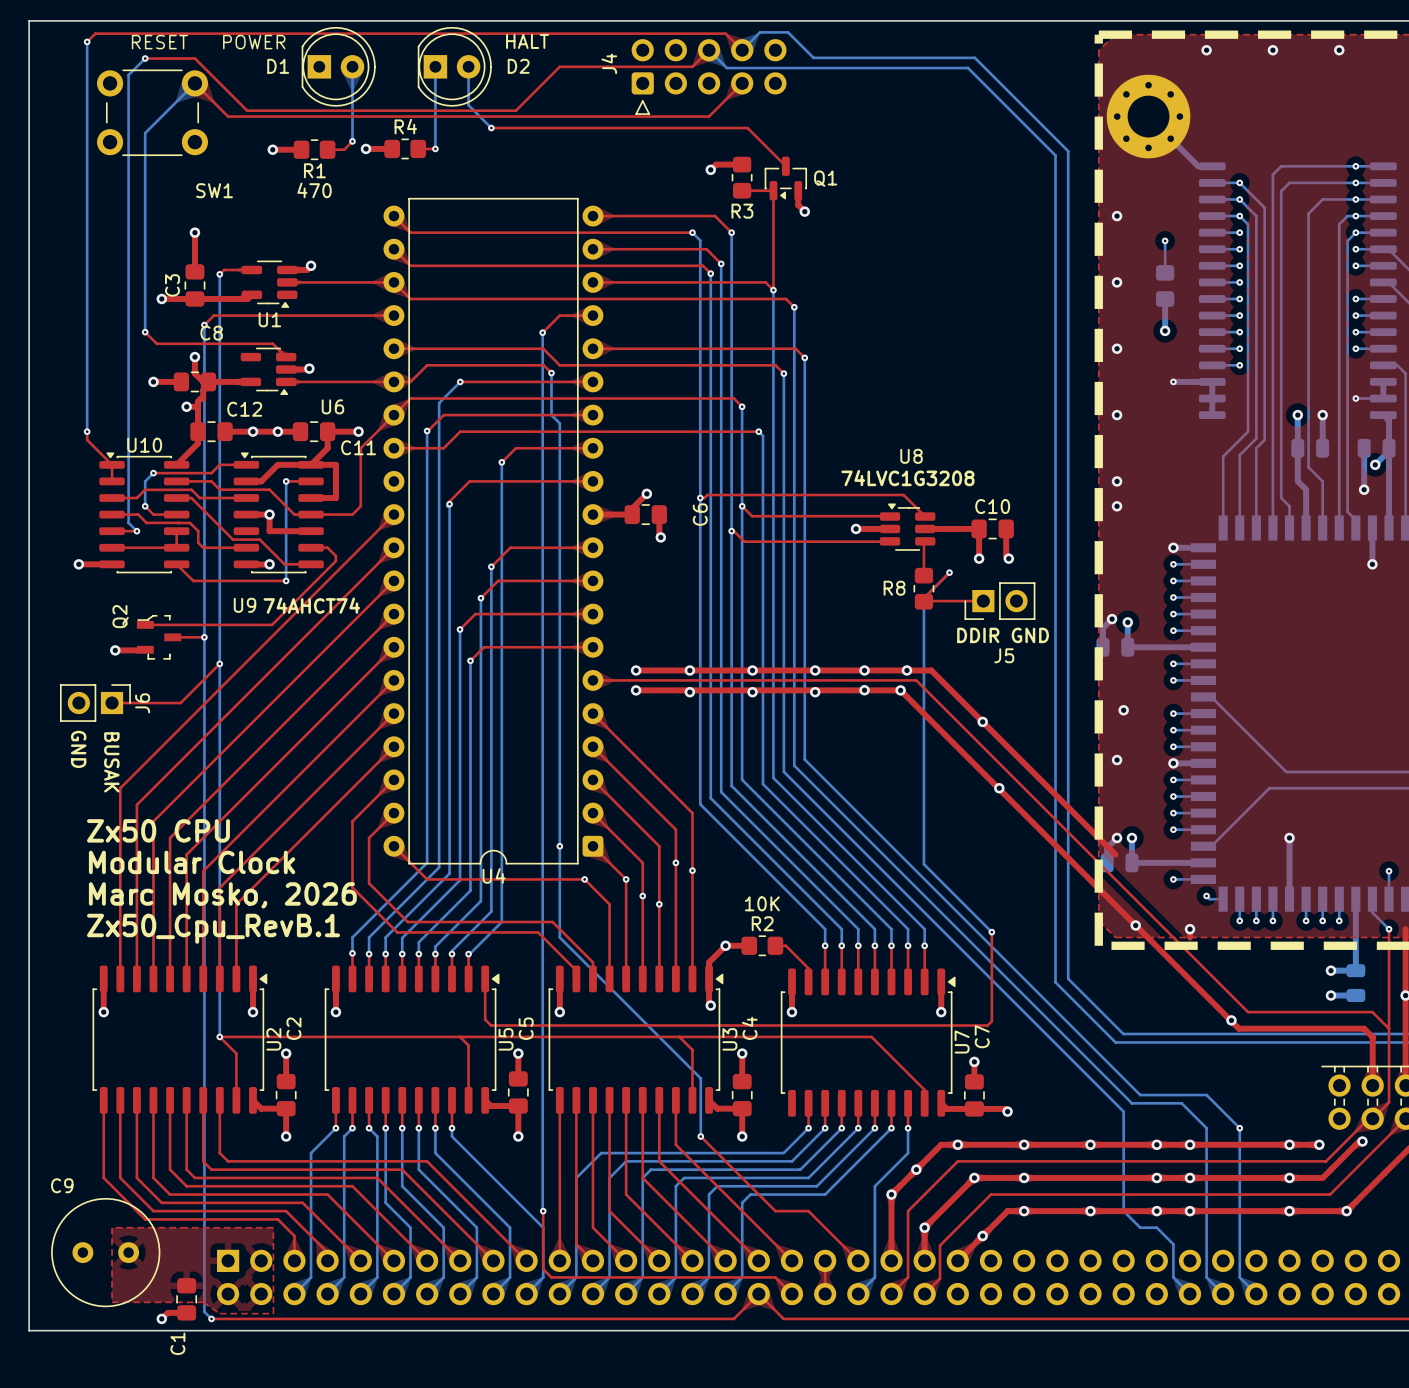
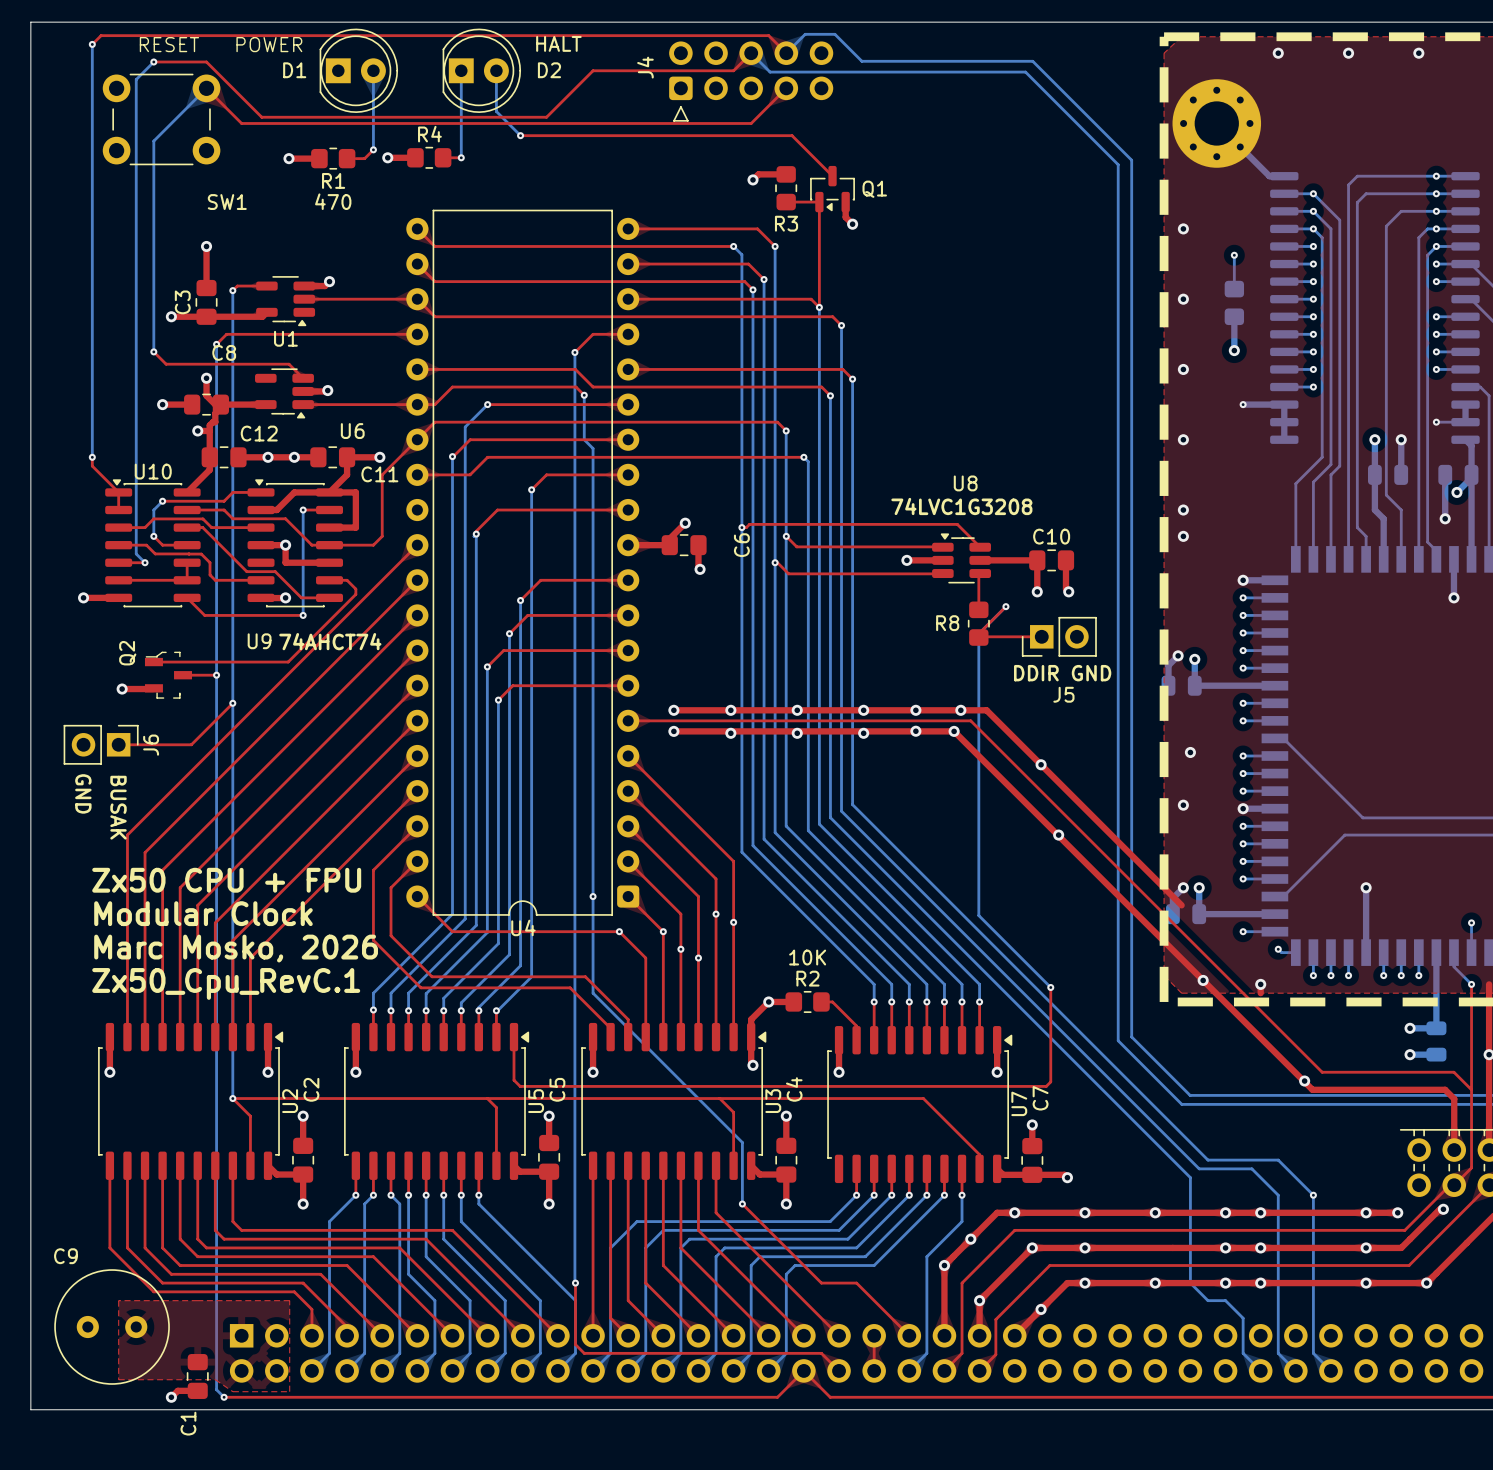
text: Zx50 CPU (158, 830) -> Zx50 CPU + FPU (226, 880)
text: Zx50_Cpu_RevB.1 (213, 928) -> Zx50_Cpu_RevC.1 (226, 983)

